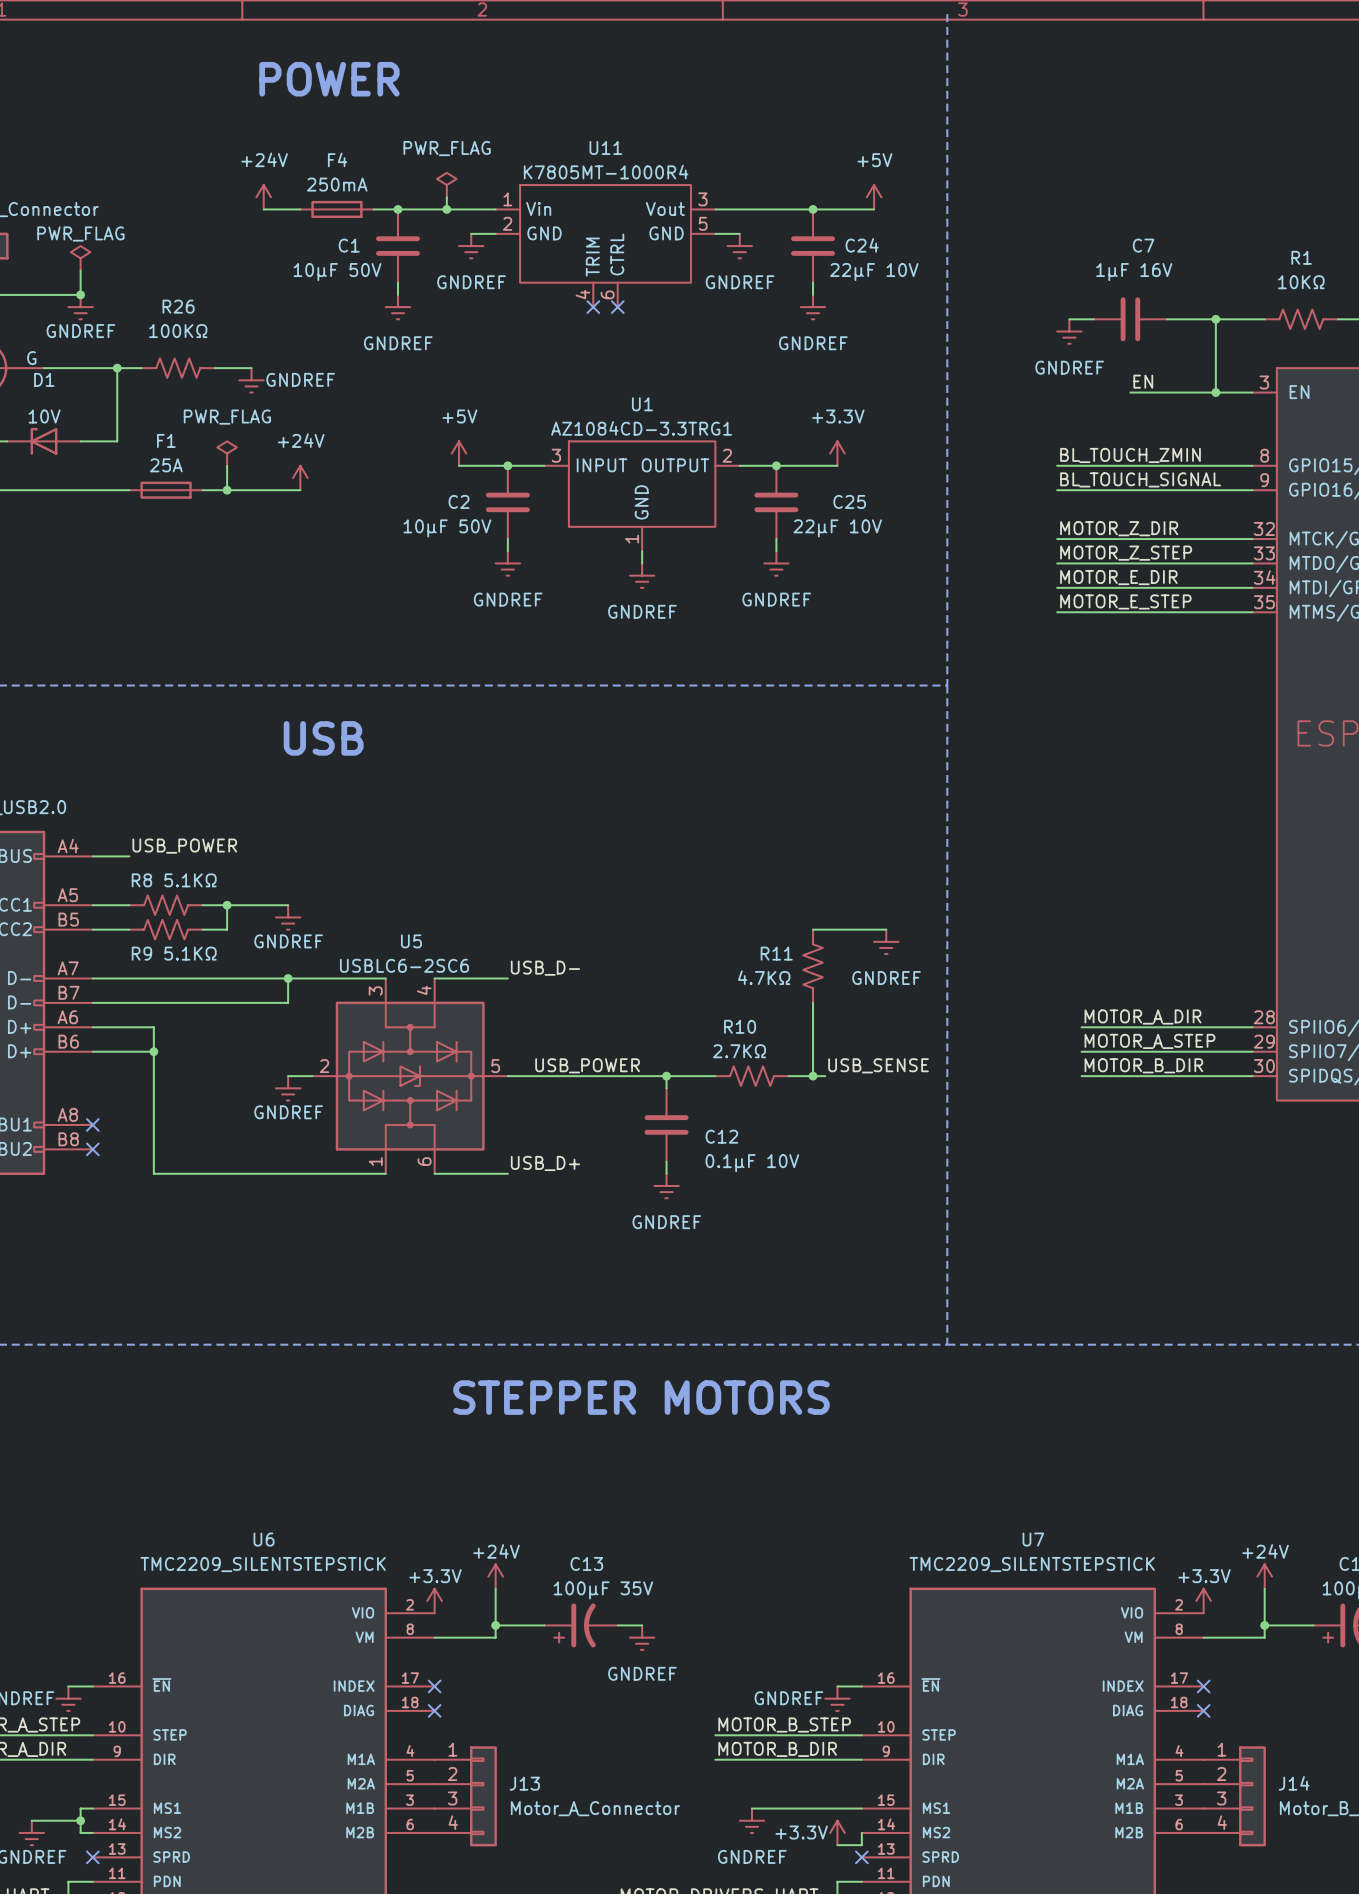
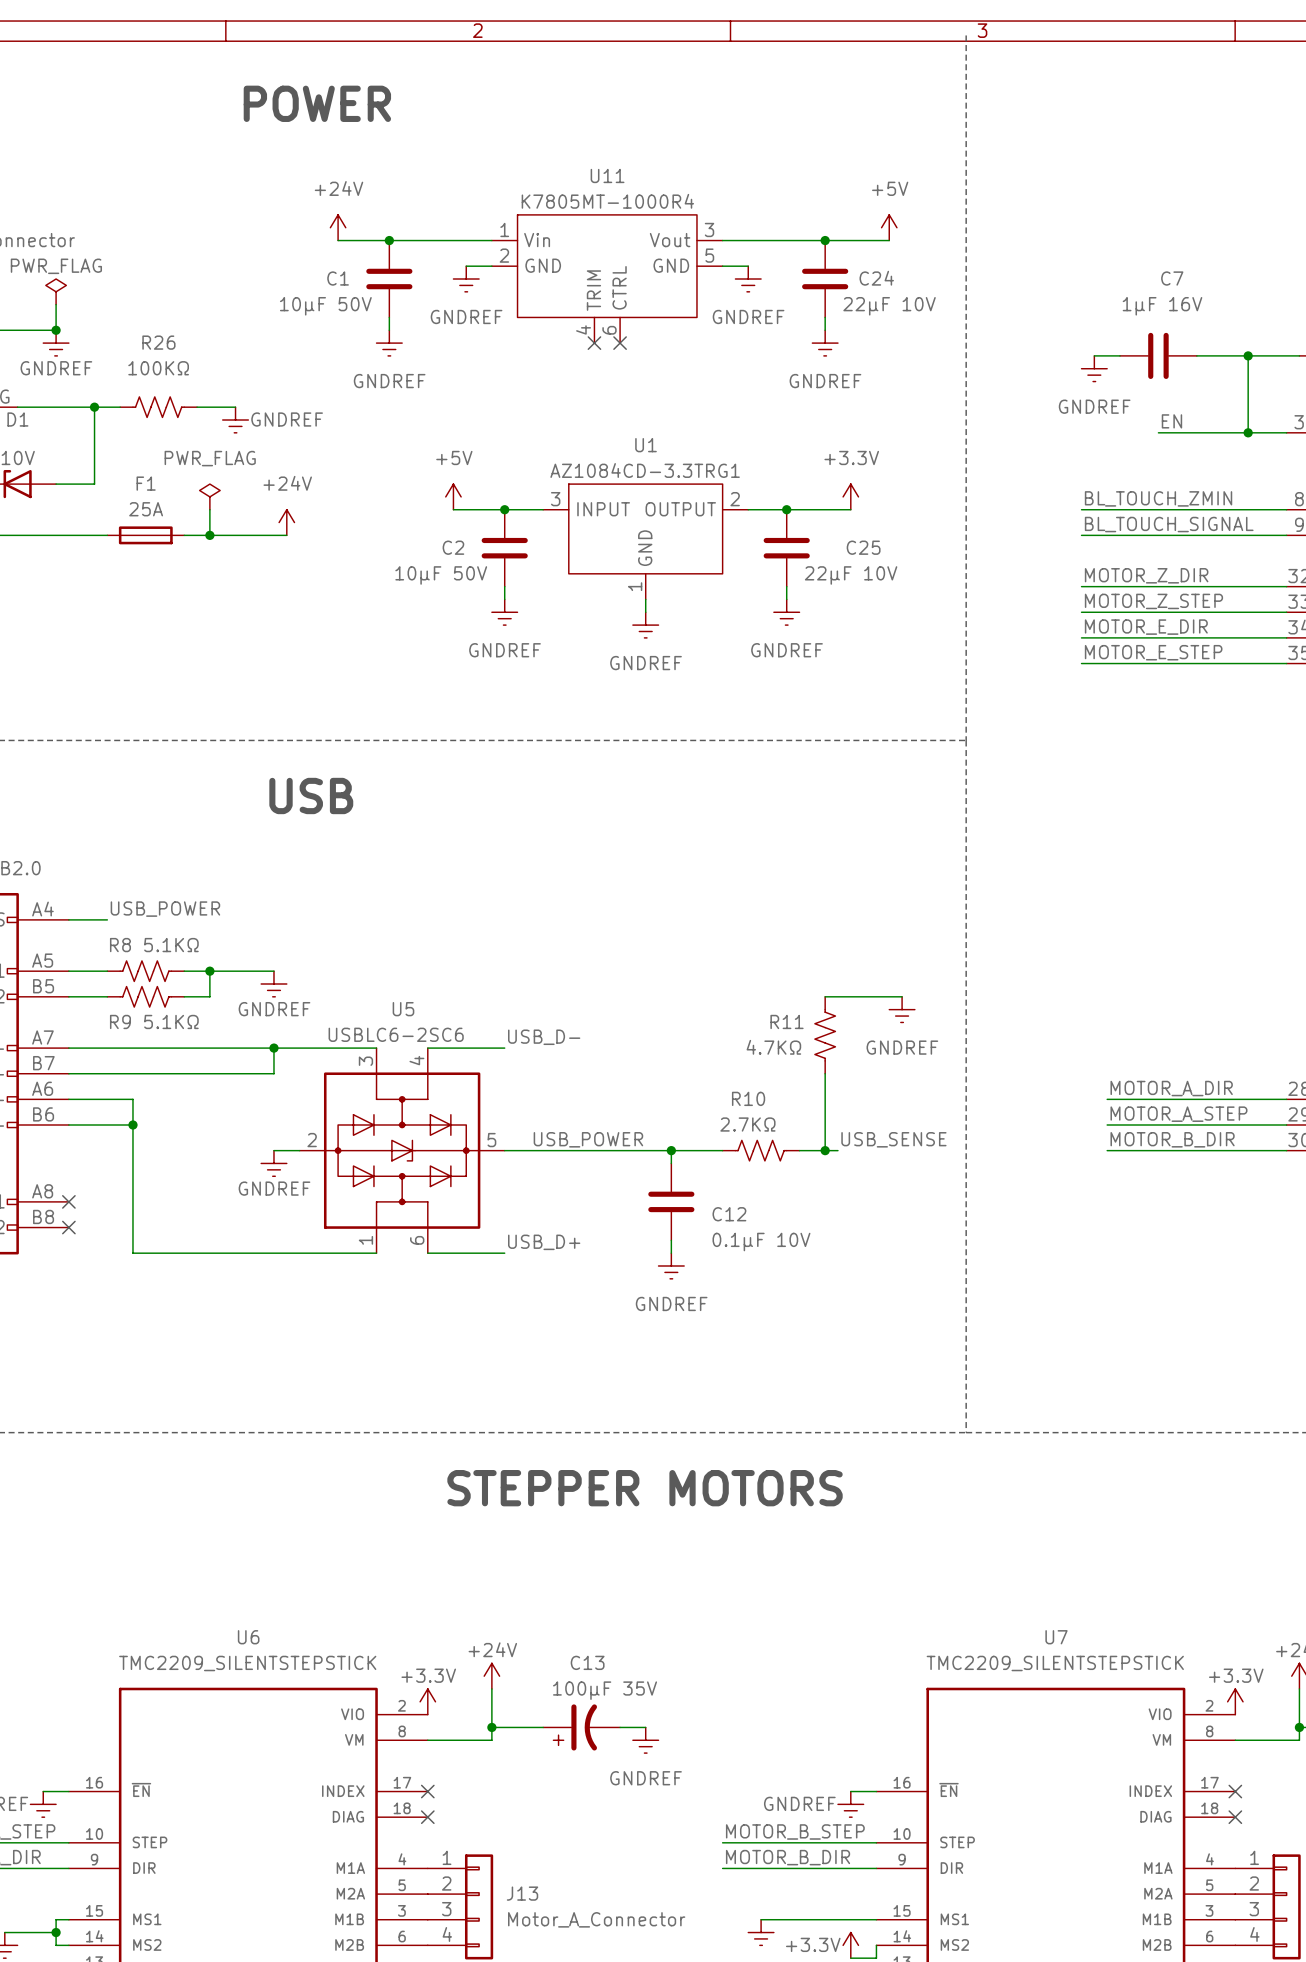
power symbol: PWR_FLAG (446, 185) -> none
power symbol position: +24V (263, 197) -> +24V (338, 227)
wire: (446, 197) (446, 209) -> none
wire: (263, 209) (300, 209) -> none
F4: 250mA (336, 209) -> none
junction: (446, 209) -> none

